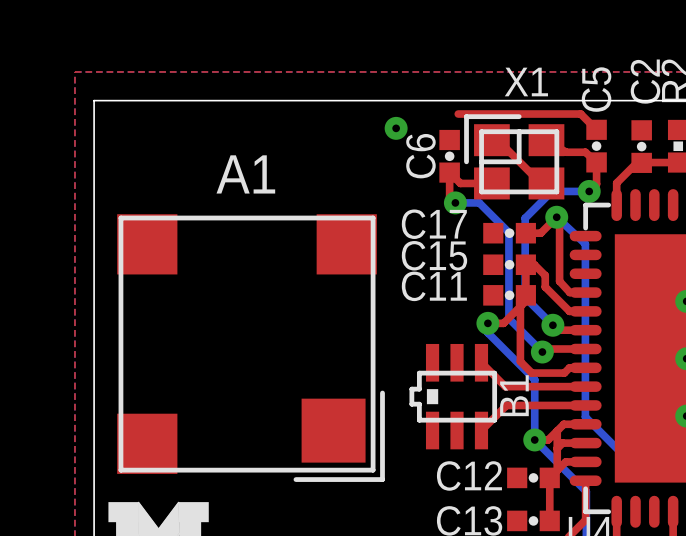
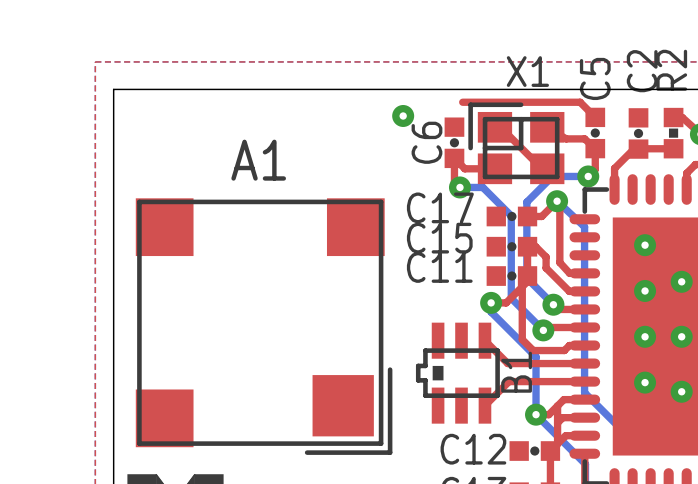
via: none -> (645, 245)
via: none -> (645, 290)
via: none -> (645, 336)
via: none -> (645, 382)

